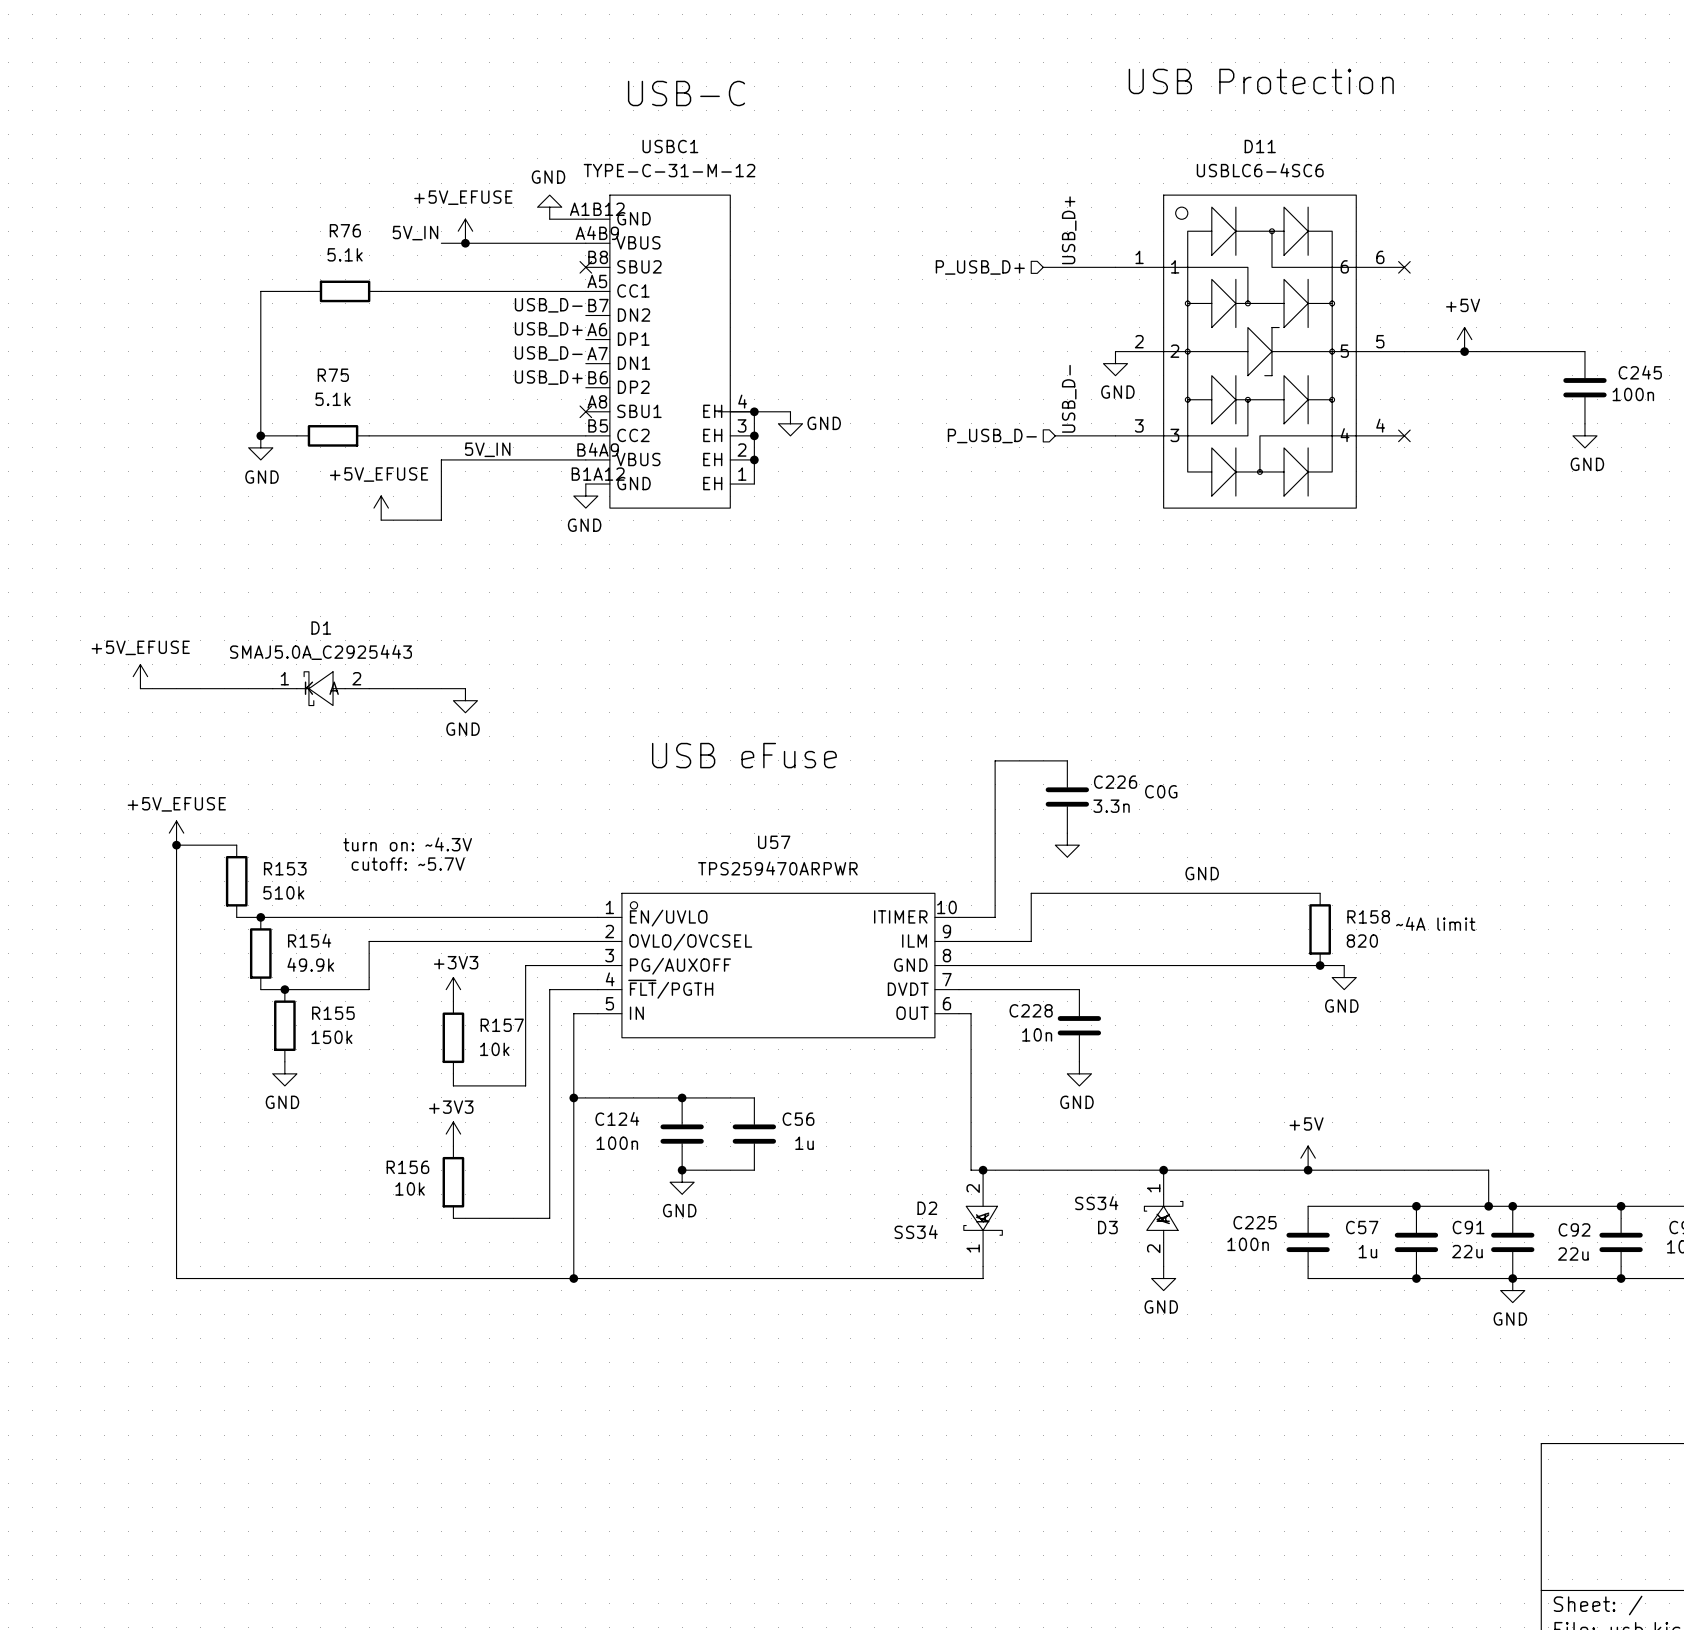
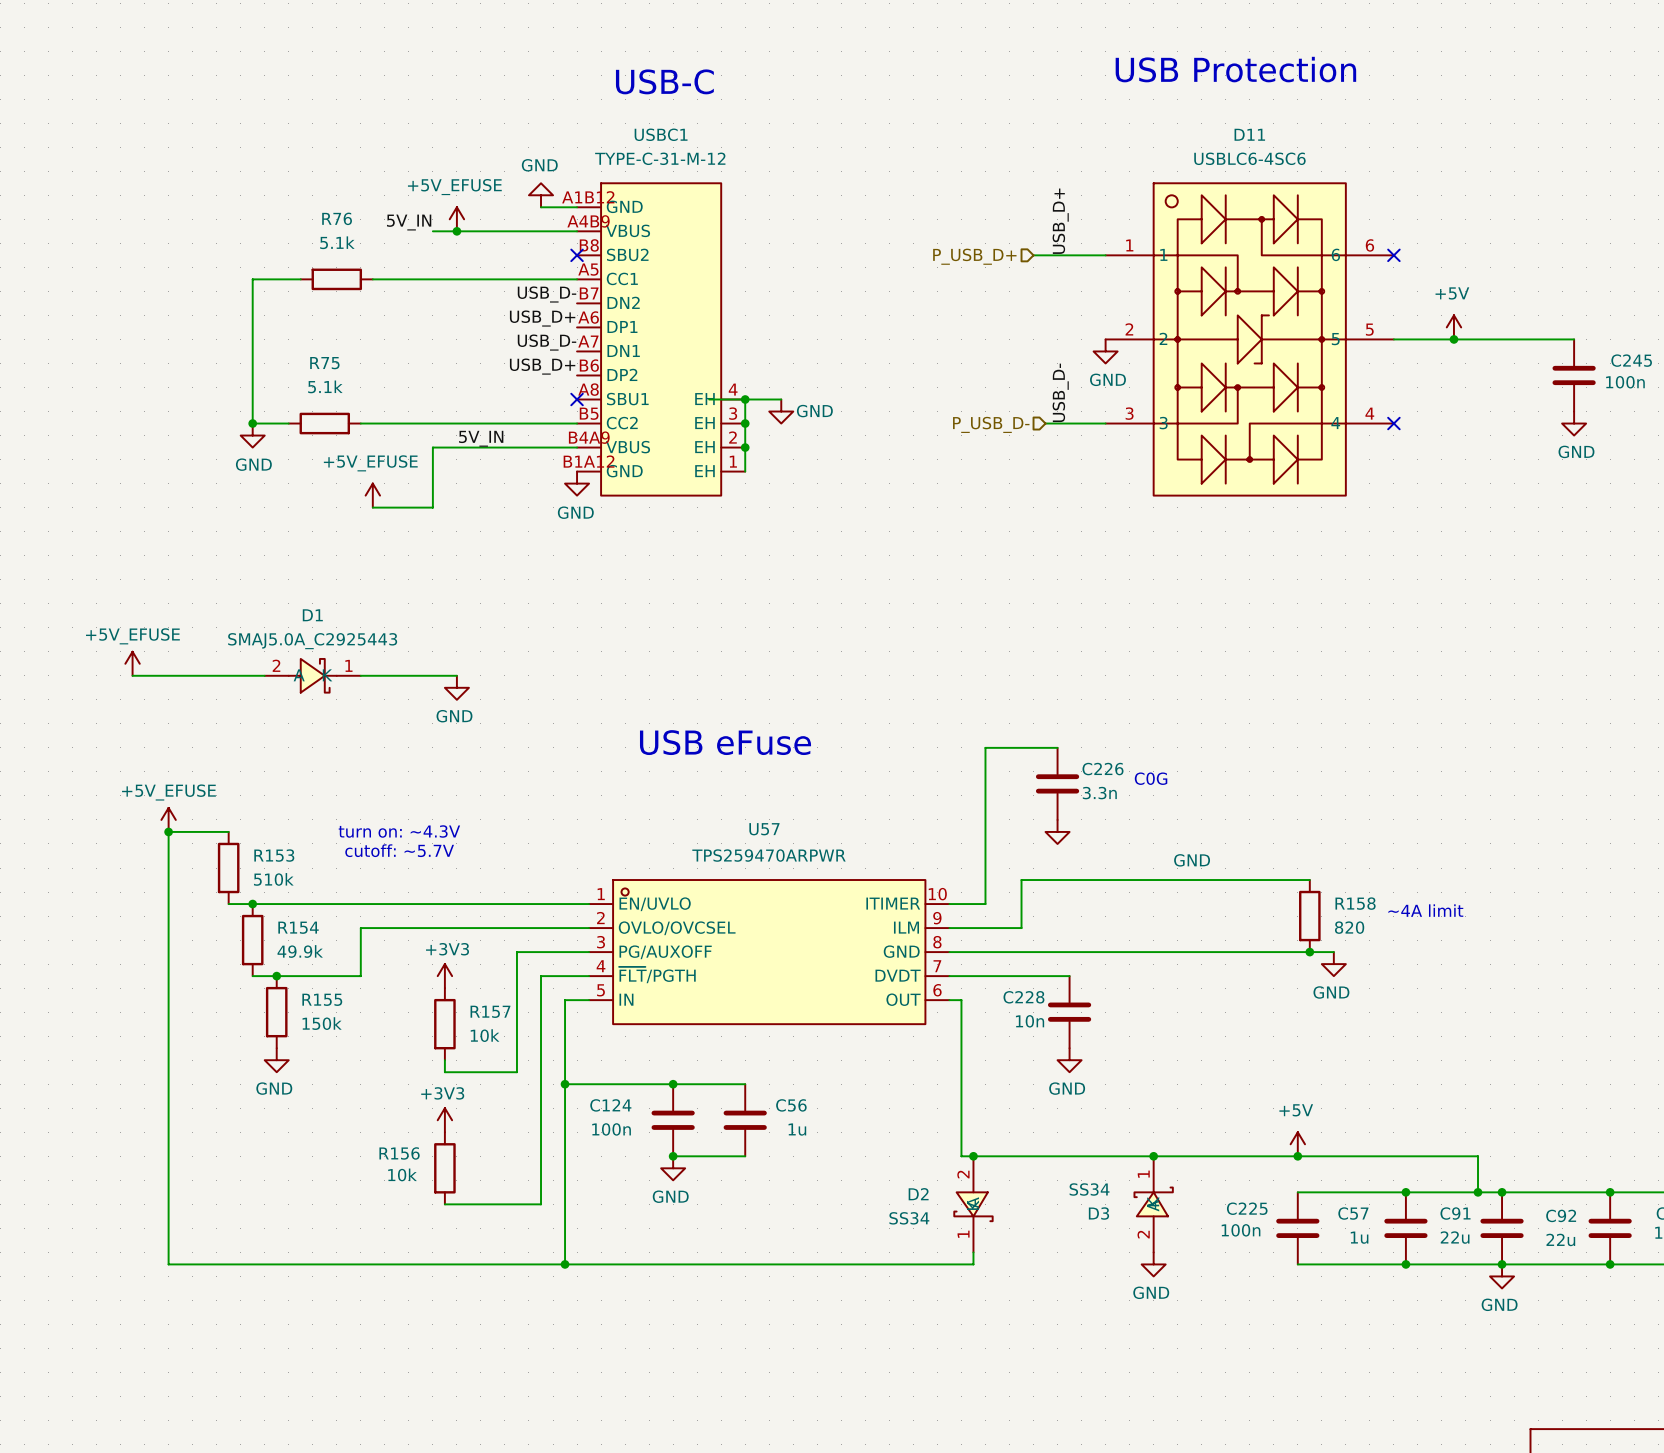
D1 rotation: 0° (320, 688) -> 180° (312, 675)

